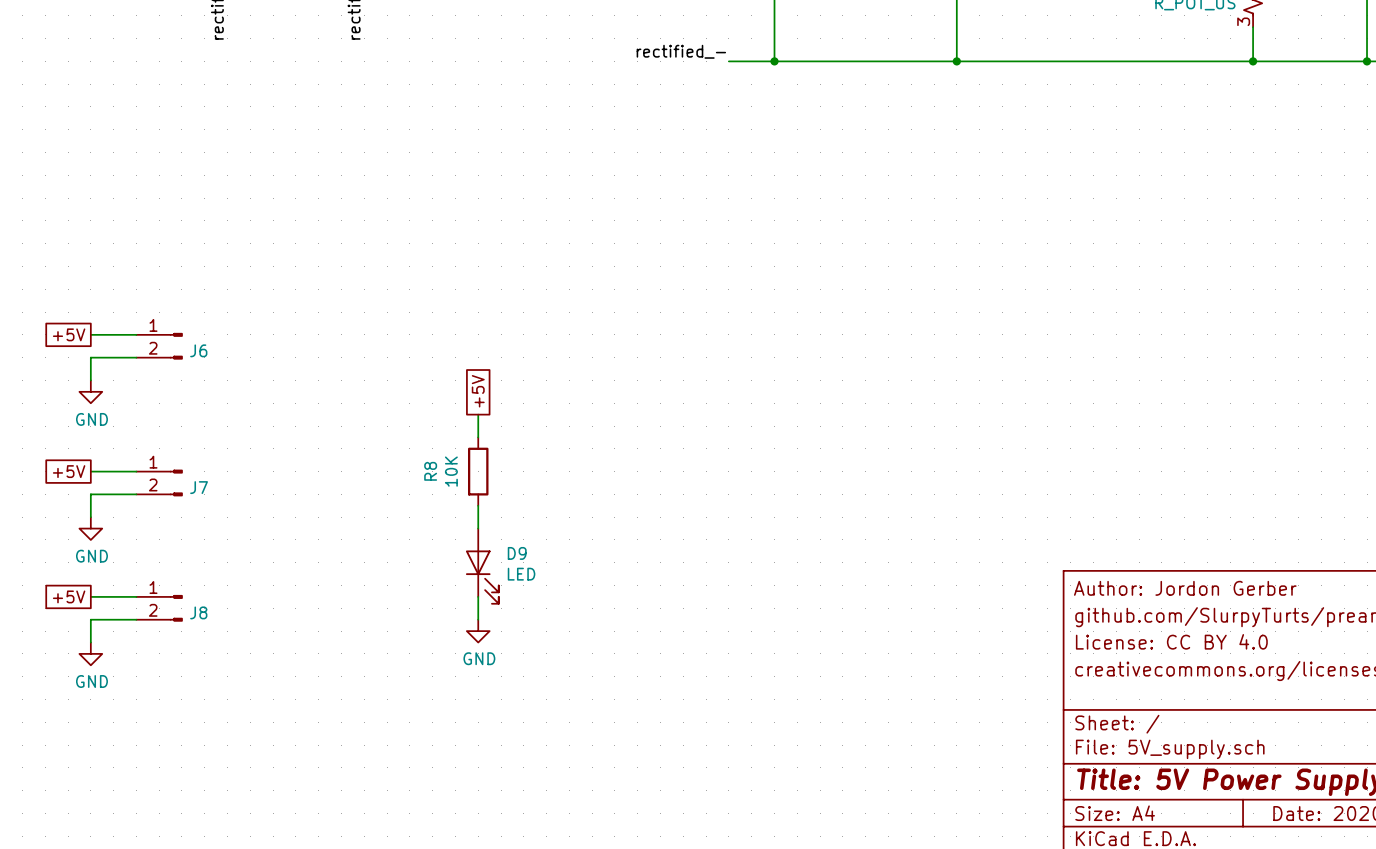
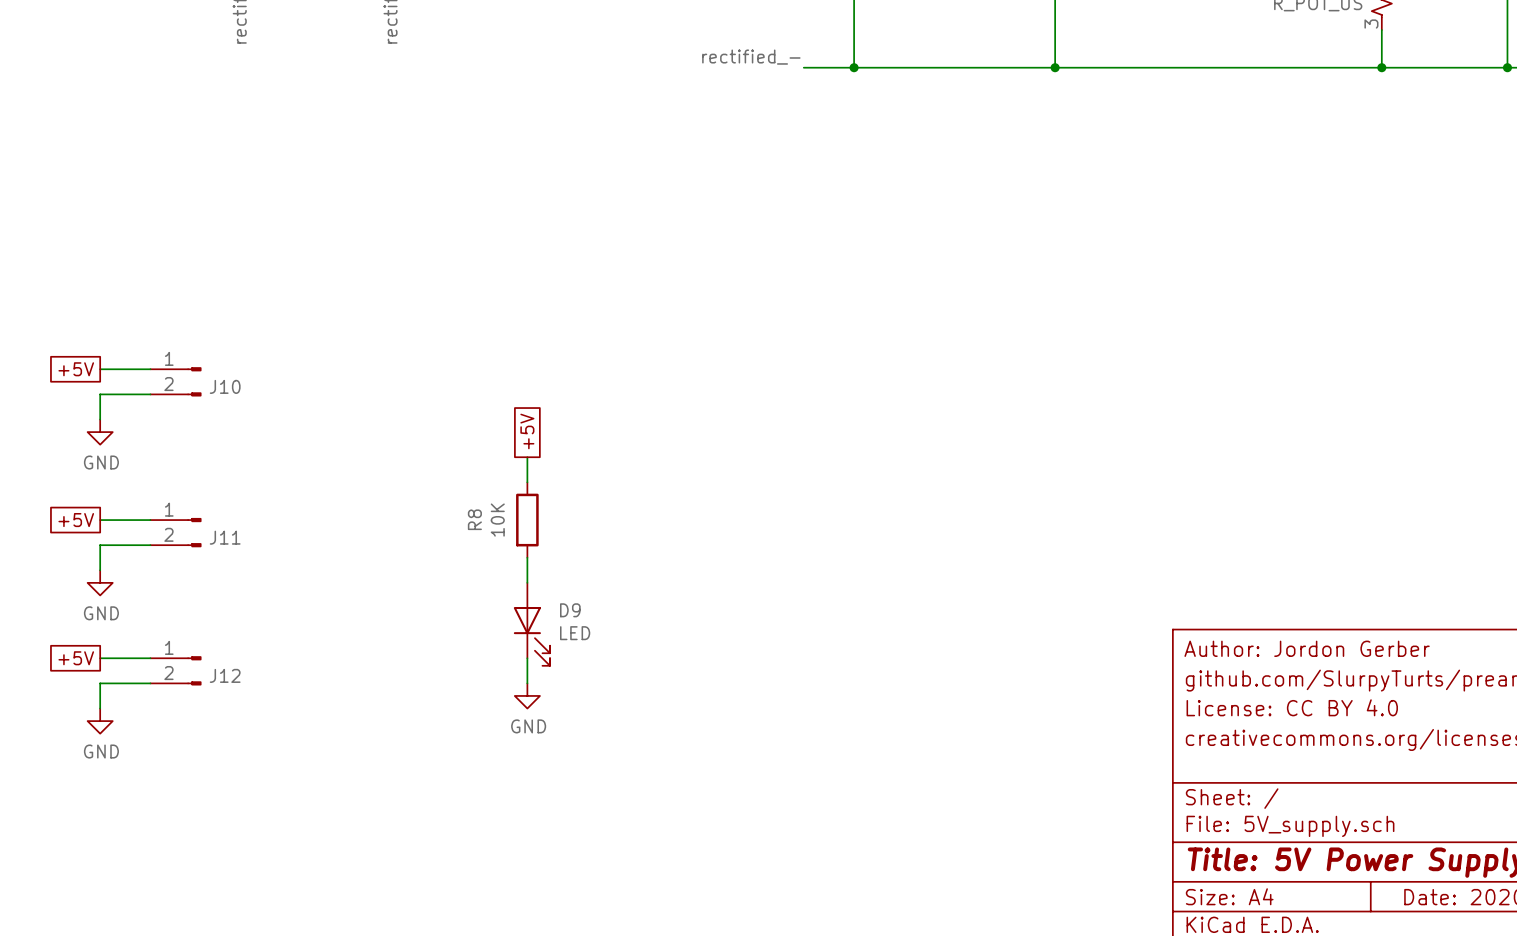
J6 name: J6 (198, 350) -> J10 (225, 386)
J7 name: J7 (199, 487) -> J11 (225, 537)
J8 name: J8 (198, 612) -> J12 (225, 675)

